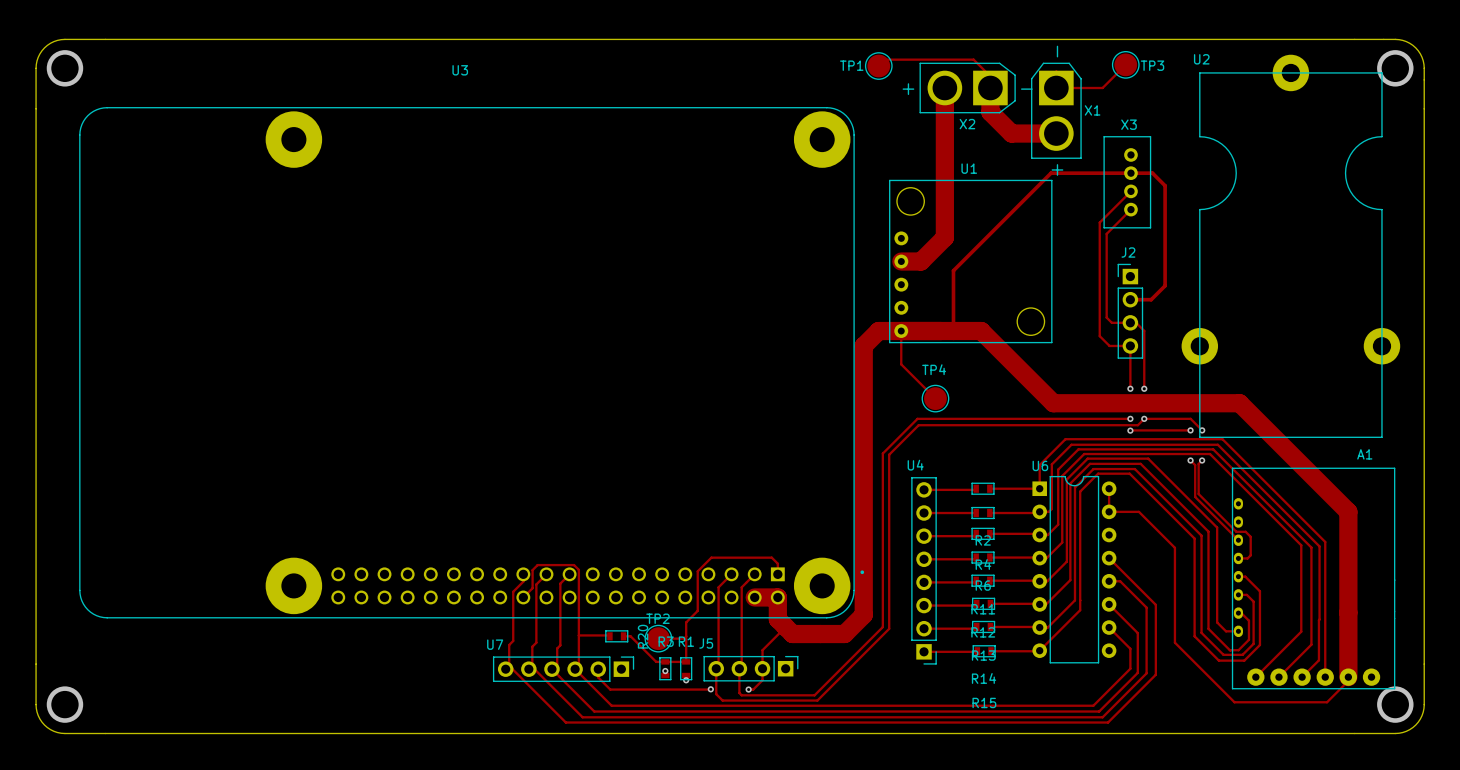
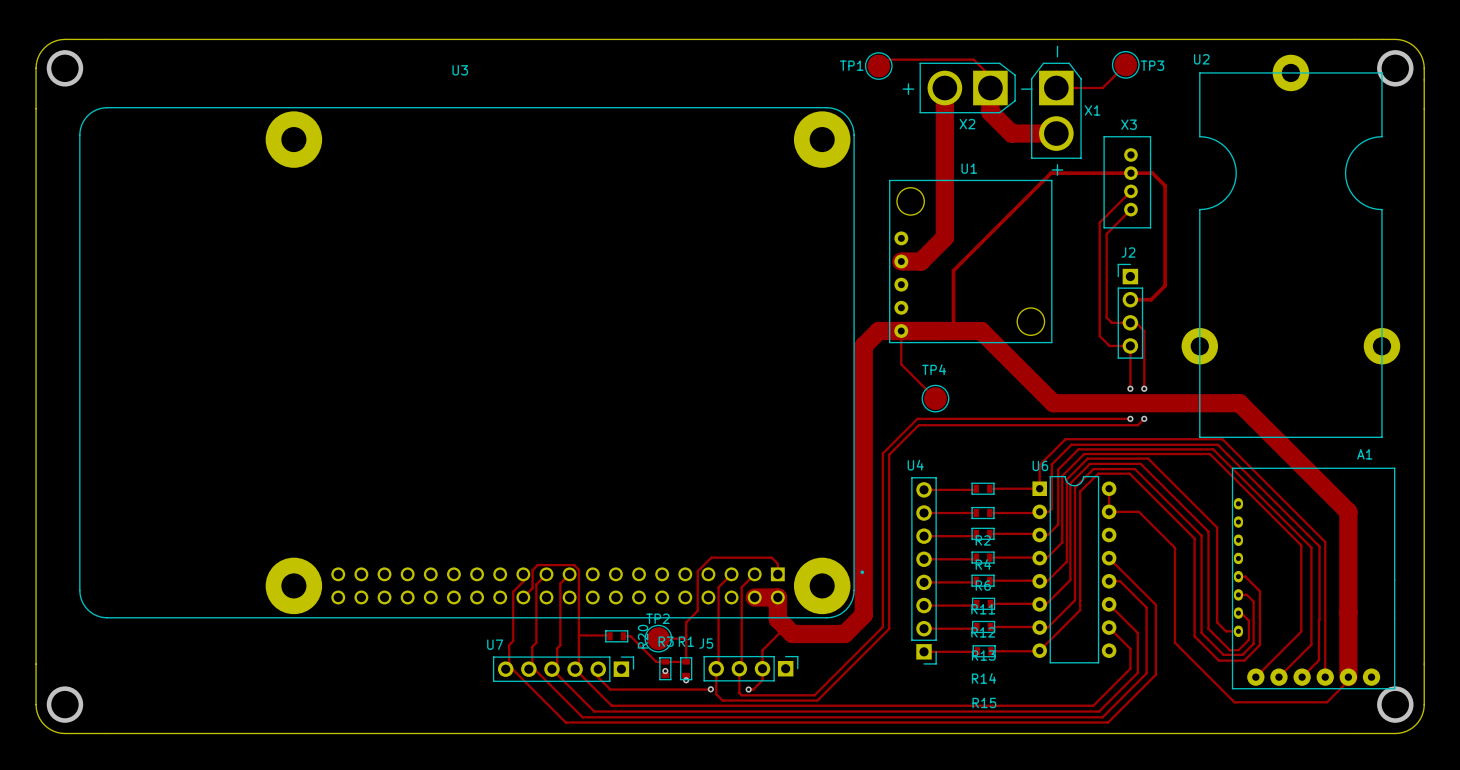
track: (1144, 418) (1190, 418) (1202, 430) -> none
via: (1130, 430) -> none
track: (1190, 430) (1130, 430) -> none
via: (1190, 430) -> none
via: (1202, 430) -> none
track: (1190, 460) (1195, 465) (1195, 496) (1238, 540) -> none
via: (1190, 460) -> none
track: (1202, 460) (1198, 463) (1198, 494) (1236, 531) (1245, 531) (1250, 536) (1250, 555) (1247, 558) (1238, 558) -> none
via: (1202, 460) -> none

